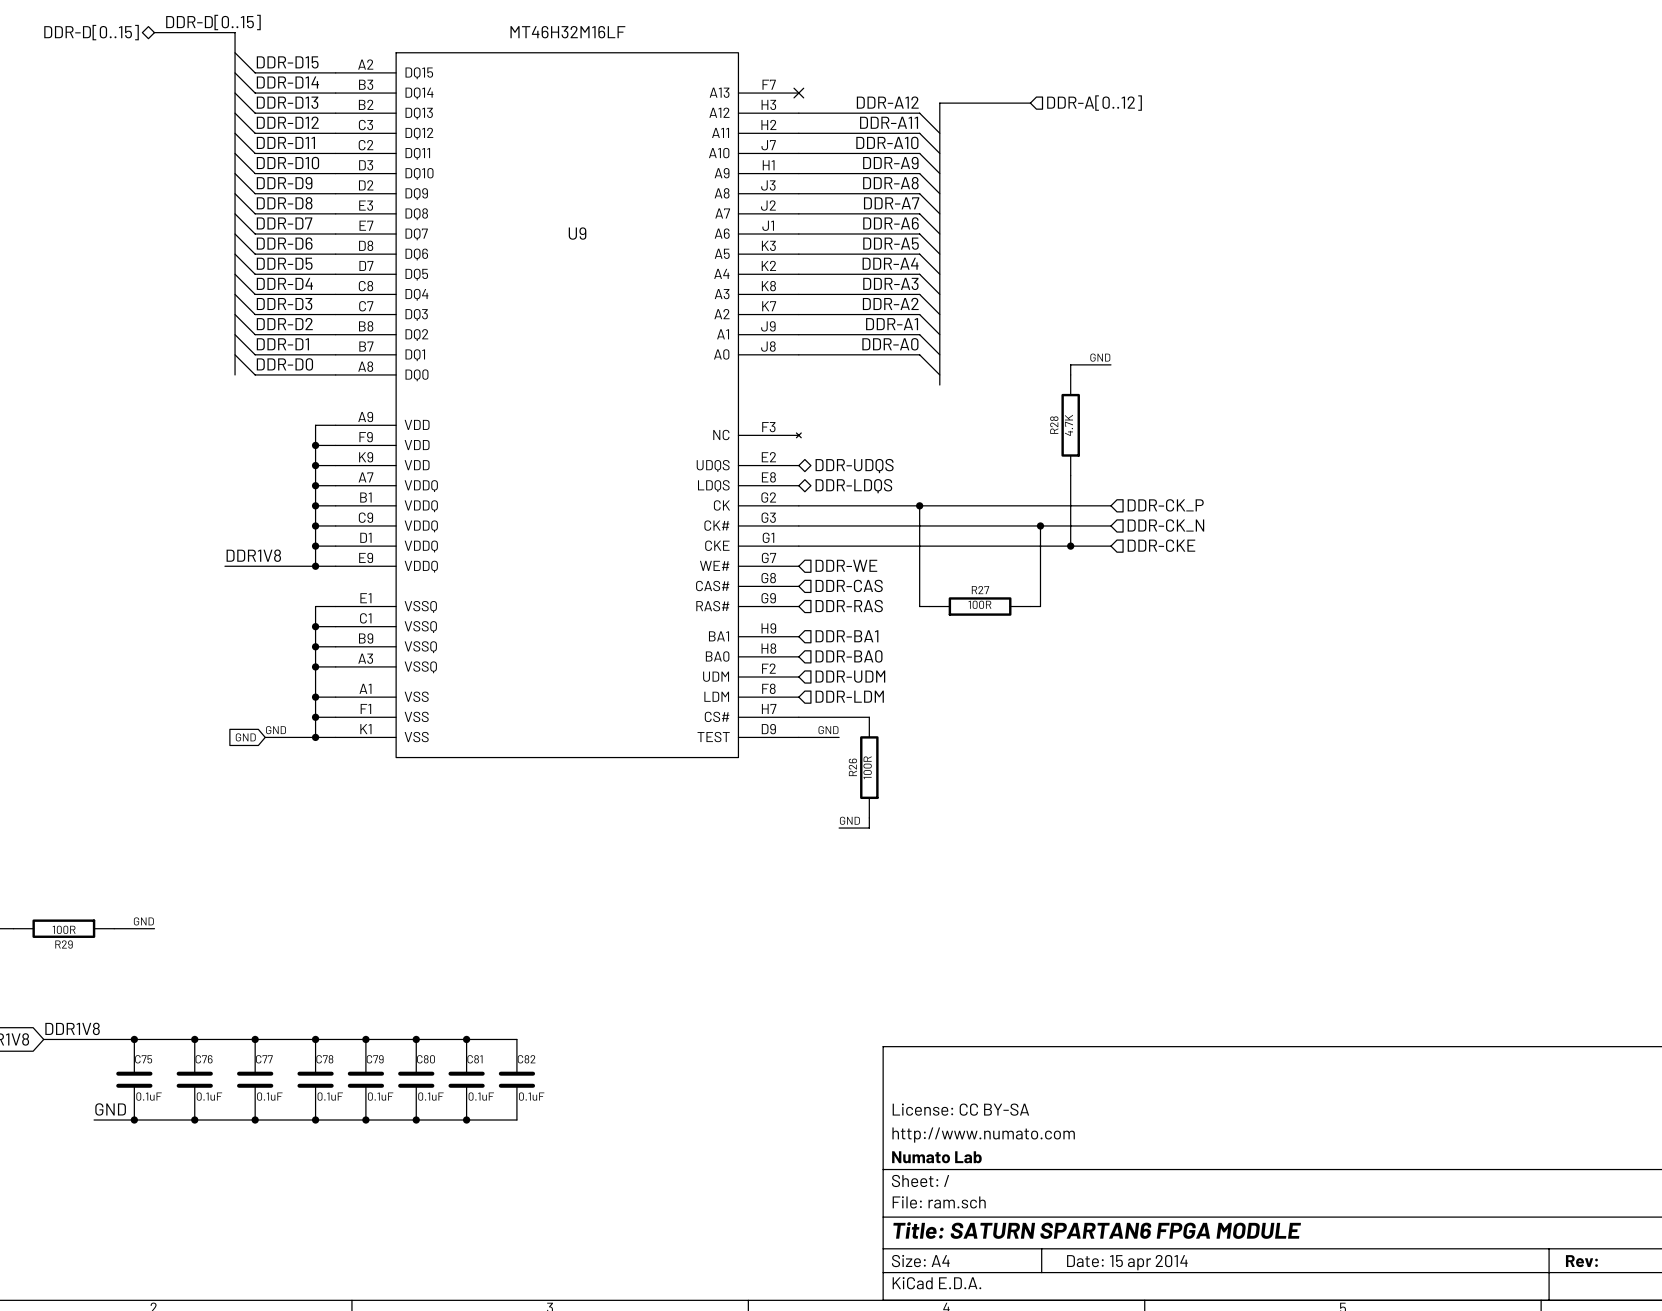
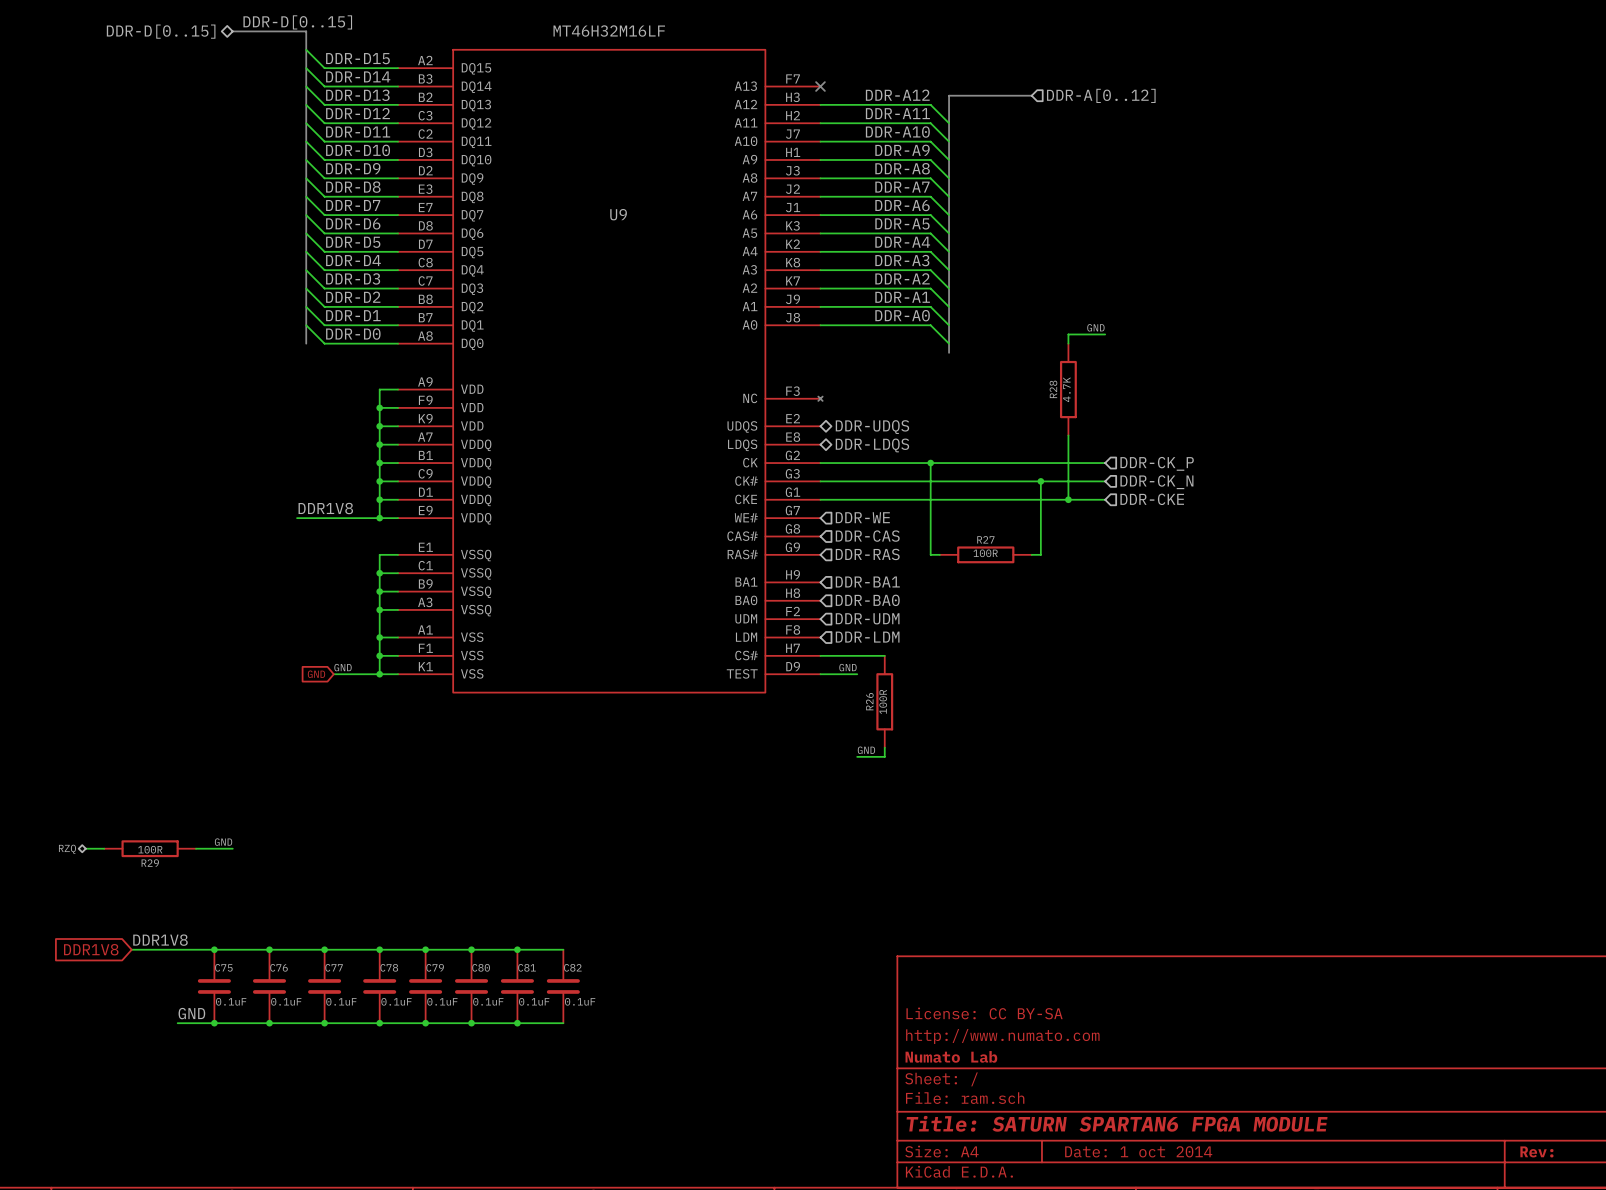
title block: Date: 15 apr 2014 (1127, 1262) -> Date: 1 oct 2014 (1138, 1151)

